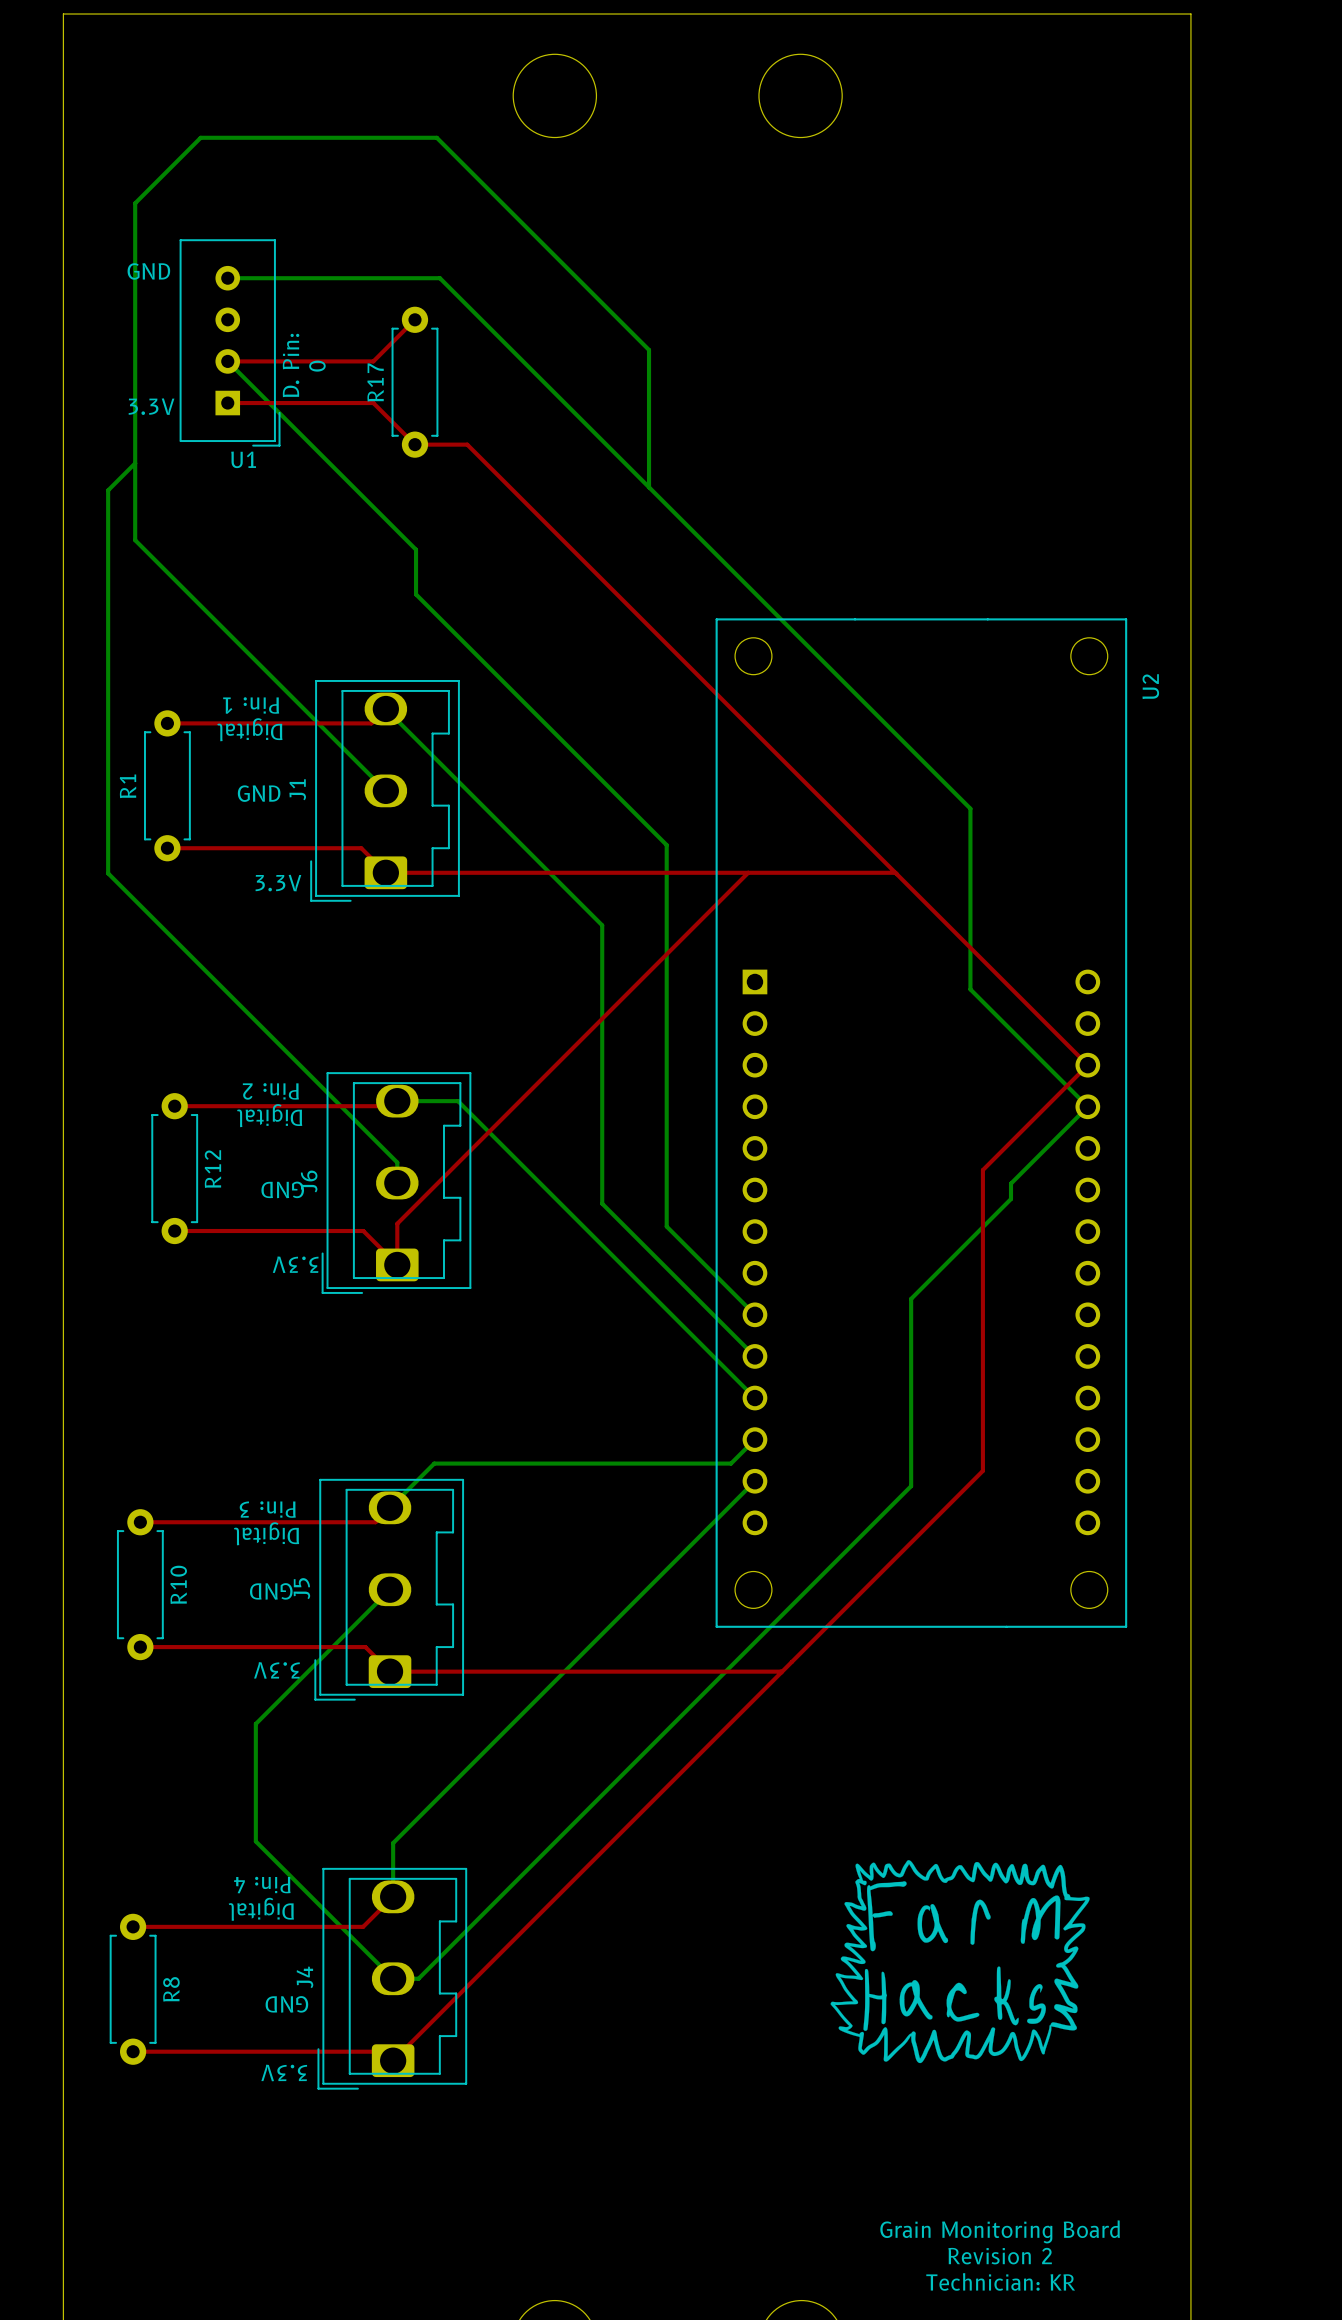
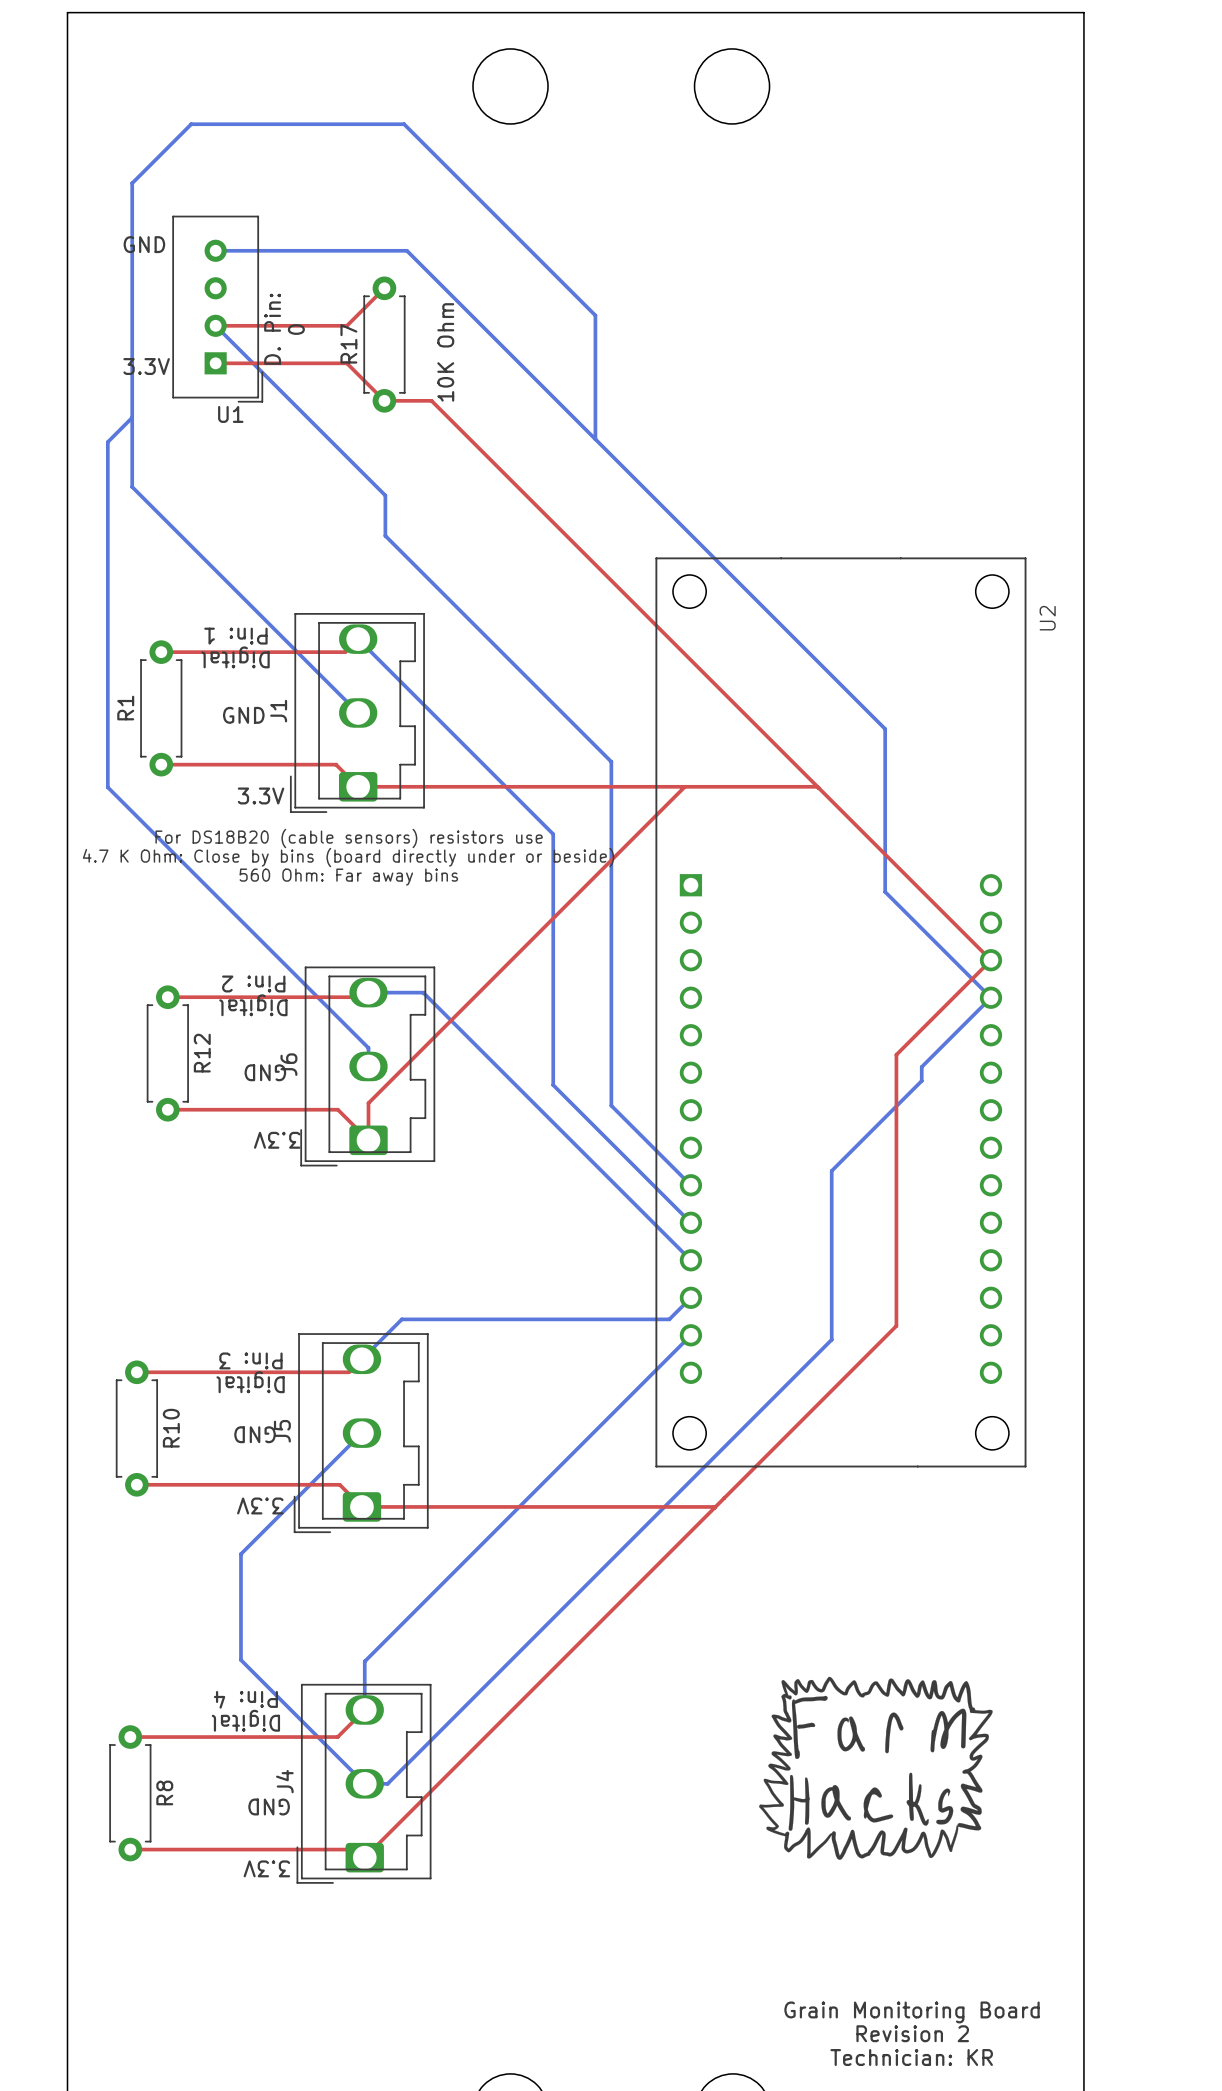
text: none -> 10K Ohm (445, 352)
text: none -> For DS18B20 (cable sensors) resistors use (349, 838)
text: none -> 4.7 K Ohm: Close by bins (board directly under or beside) (348, 857)
text: none -> 560 Ohm: Far away bins (348, 877)

